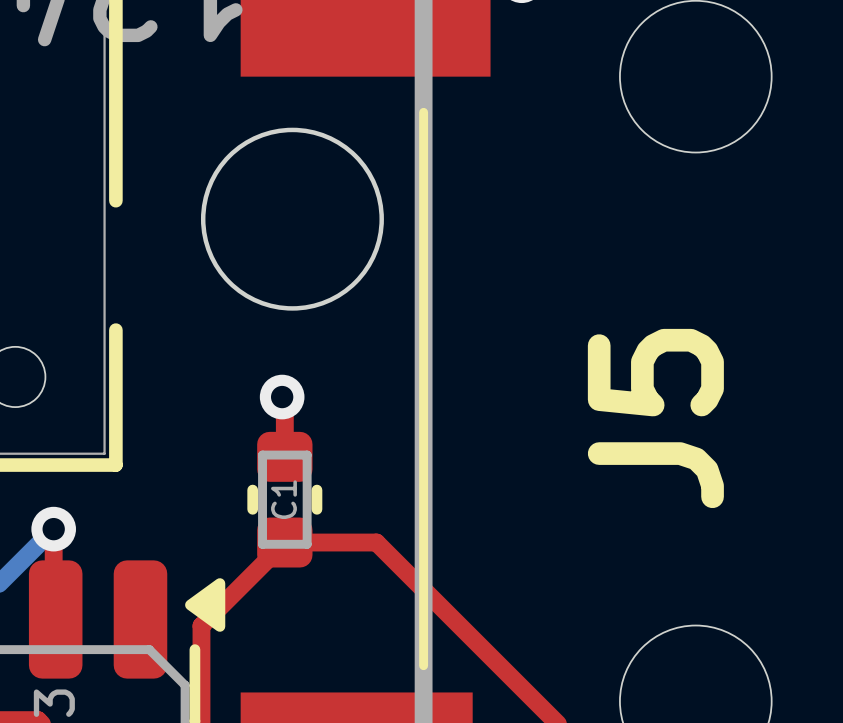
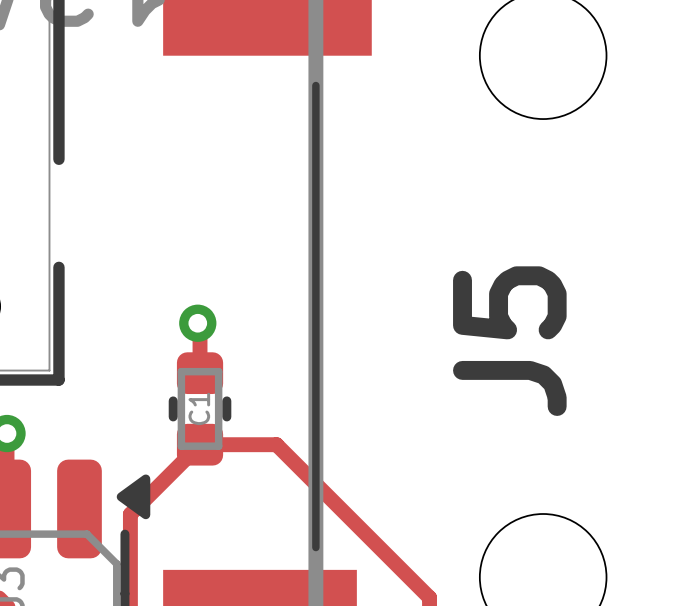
round board edge: [200, 127, 384, 311] -> none

